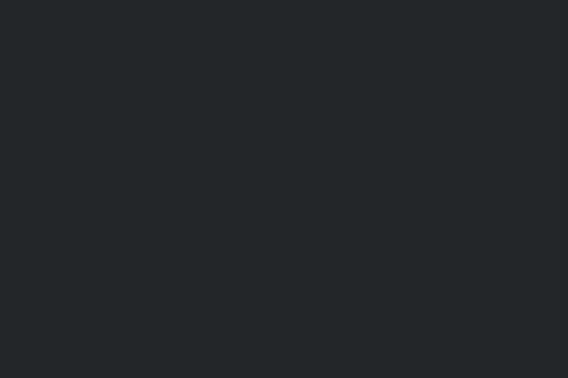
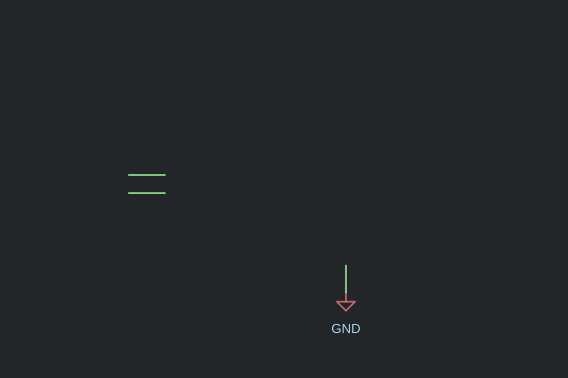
wire: none -> (128, 174) (164, 174)
wire: none -> (128, 193) (164, 193)
wire: none -> (345, 265) (345, 292)
power symbol: none -> GND (345, 301)

